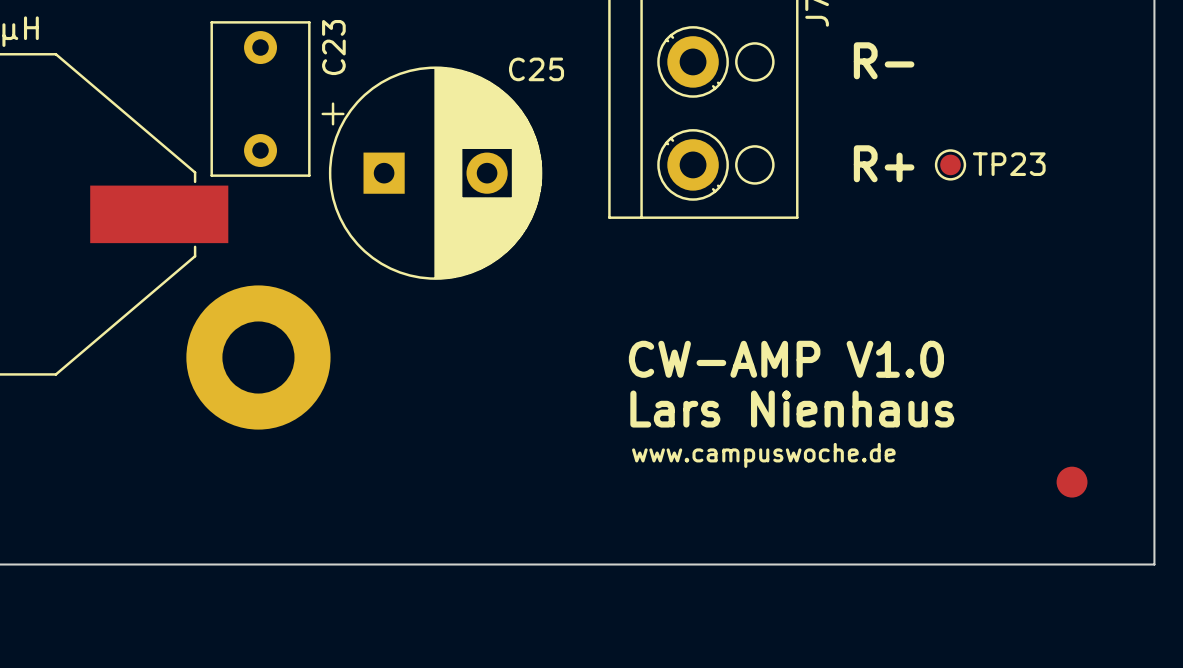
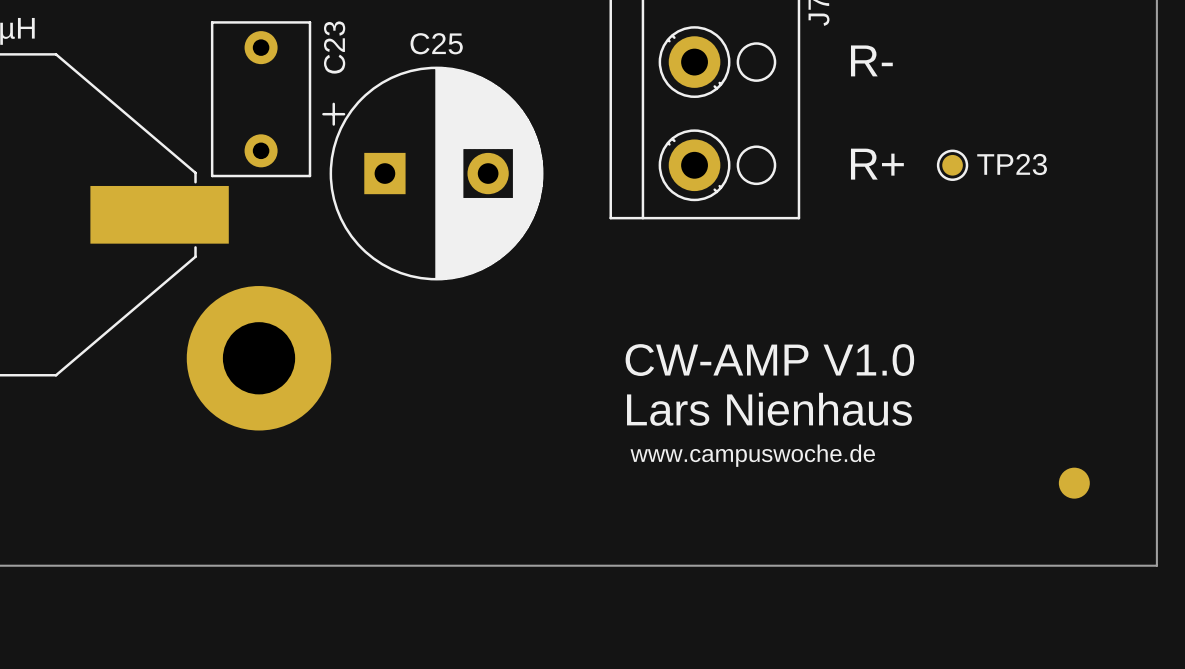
C25 name position: C25 (536, 69) -> C25 (436, 43)

